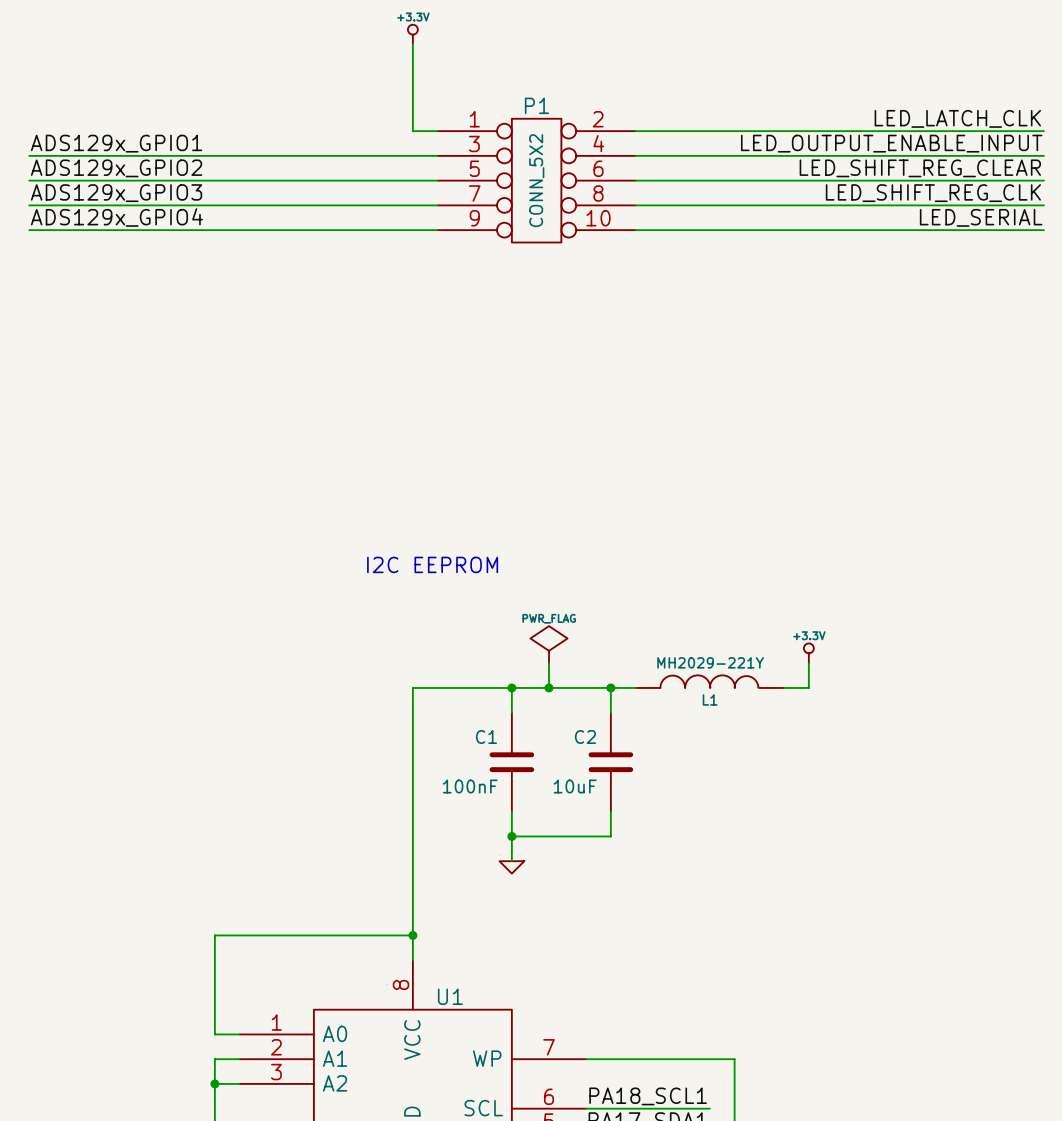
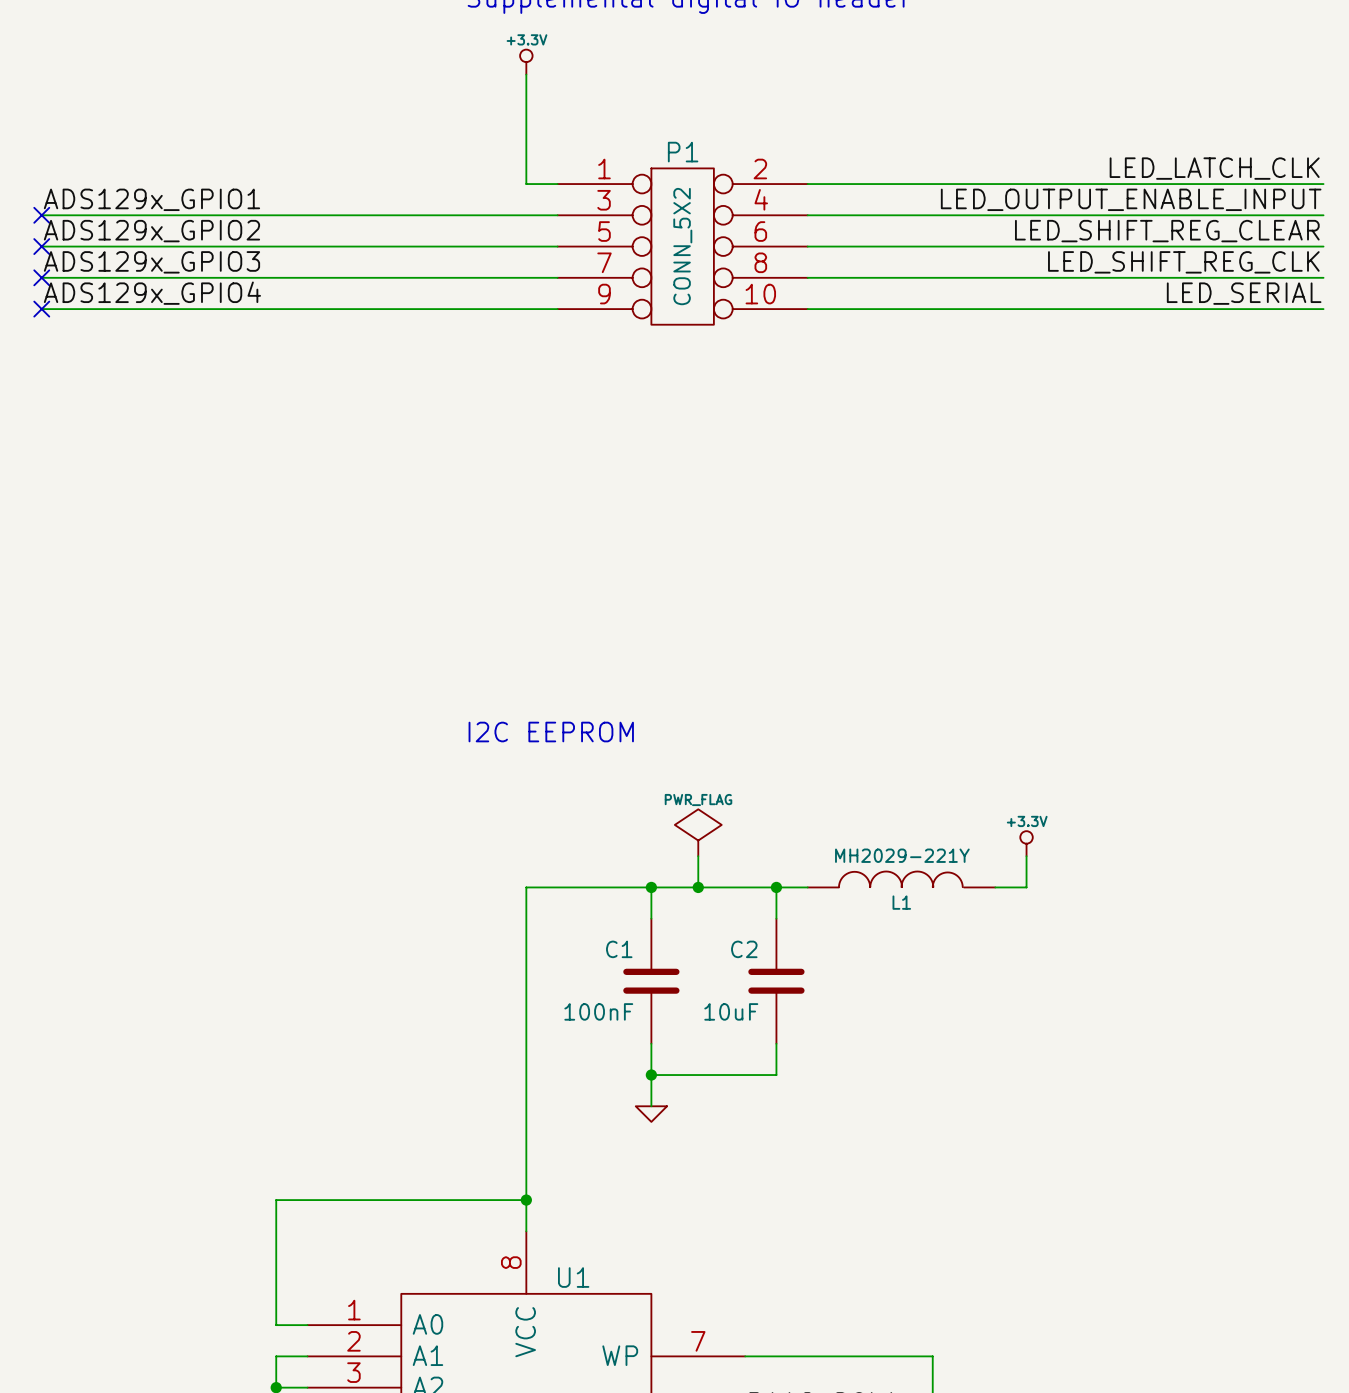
no-connect mark: none -> (41, 215)
no-connect mark: none -> (41, 246)
no-connect mark: none -> (41, 277)
no-connect mark: none -> (41, 309)

